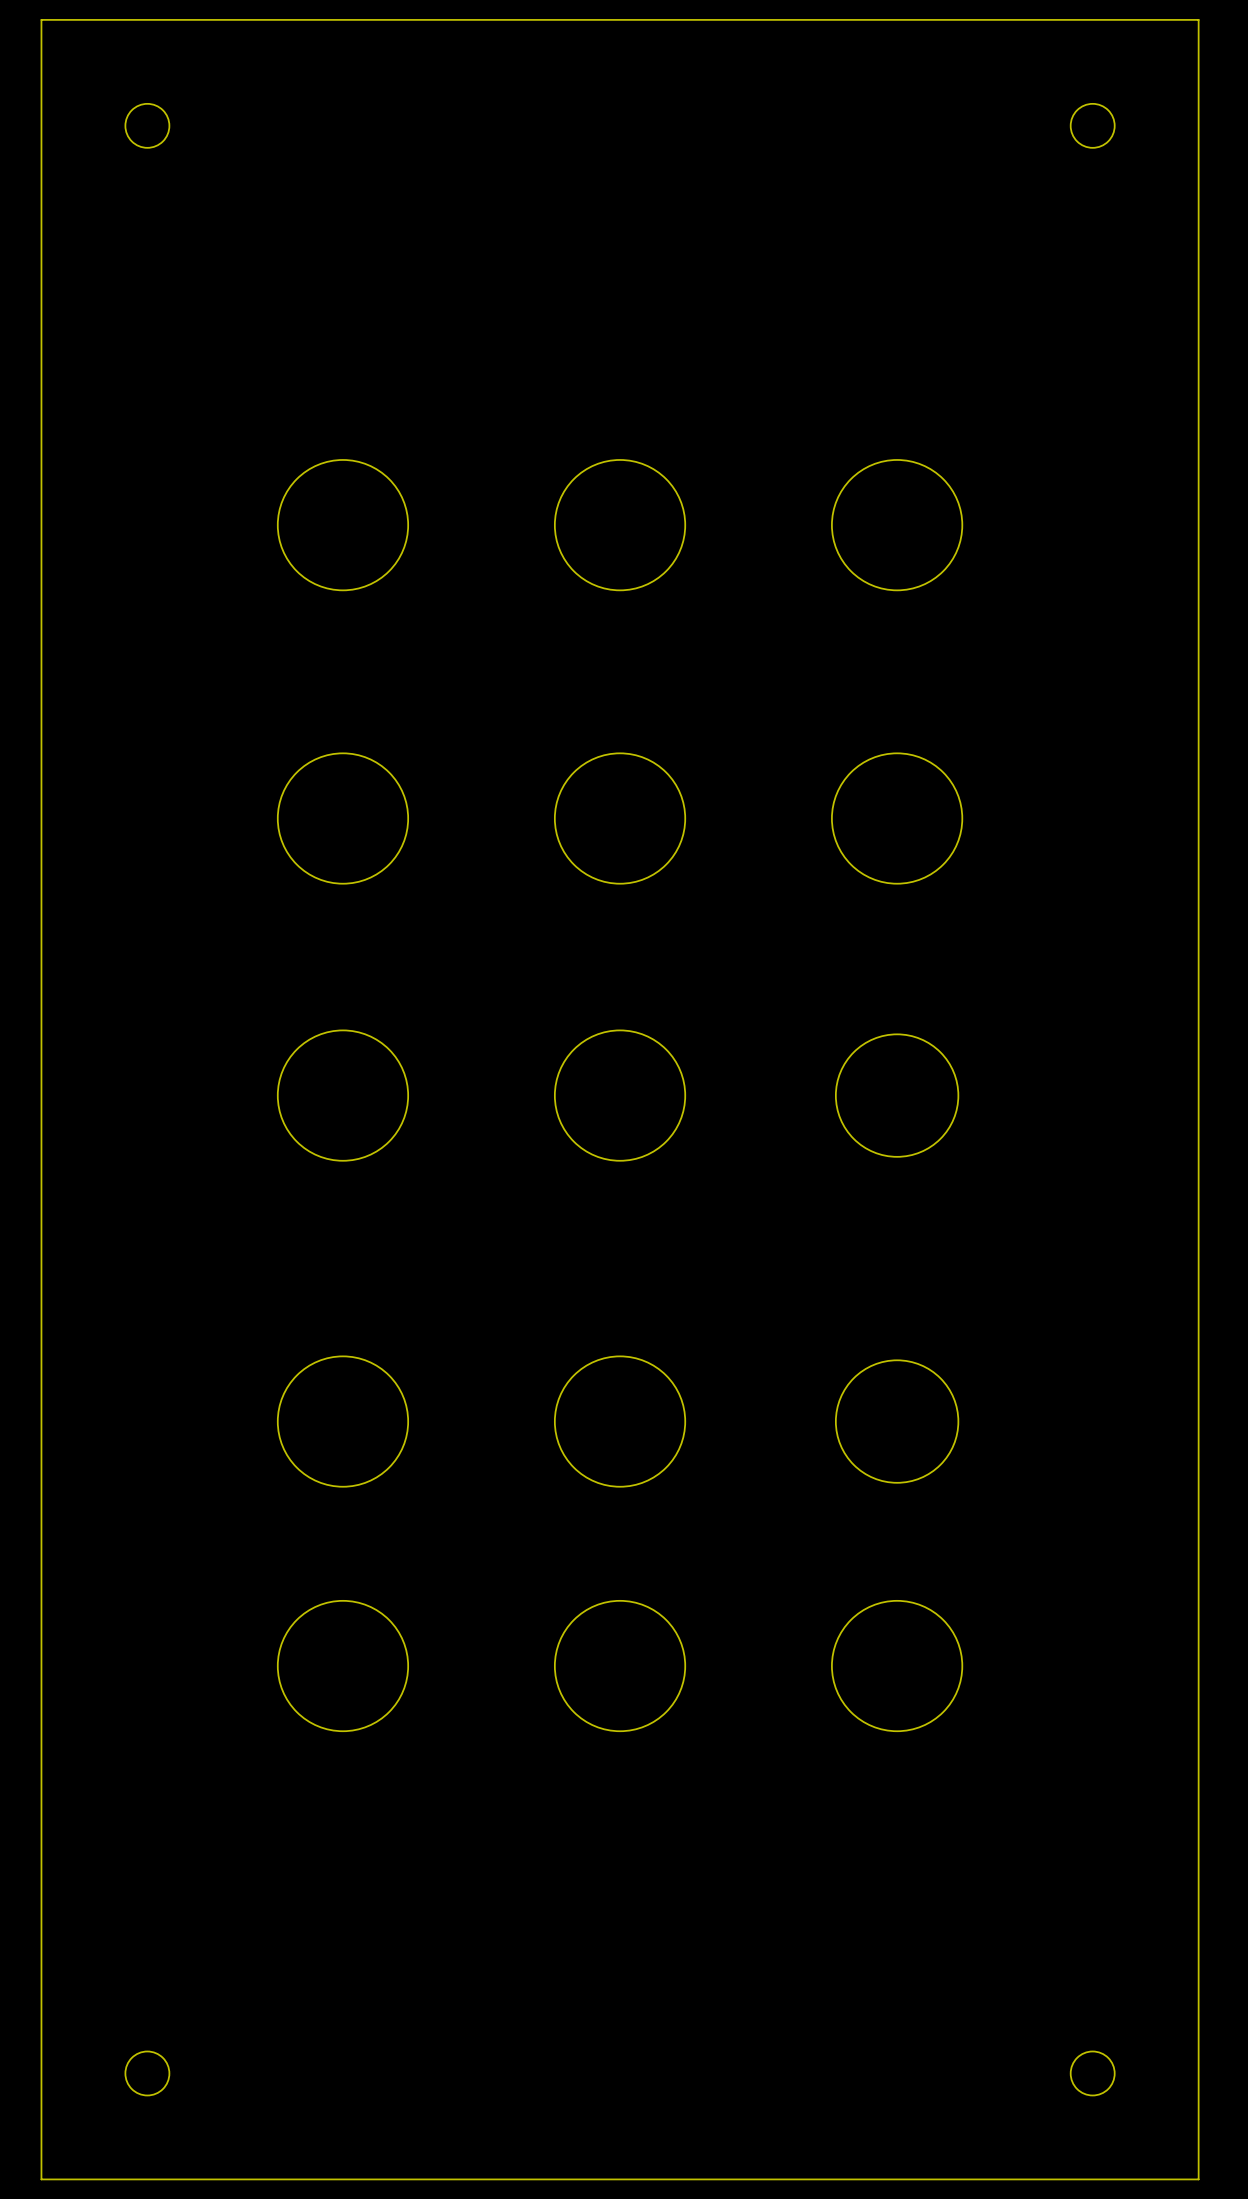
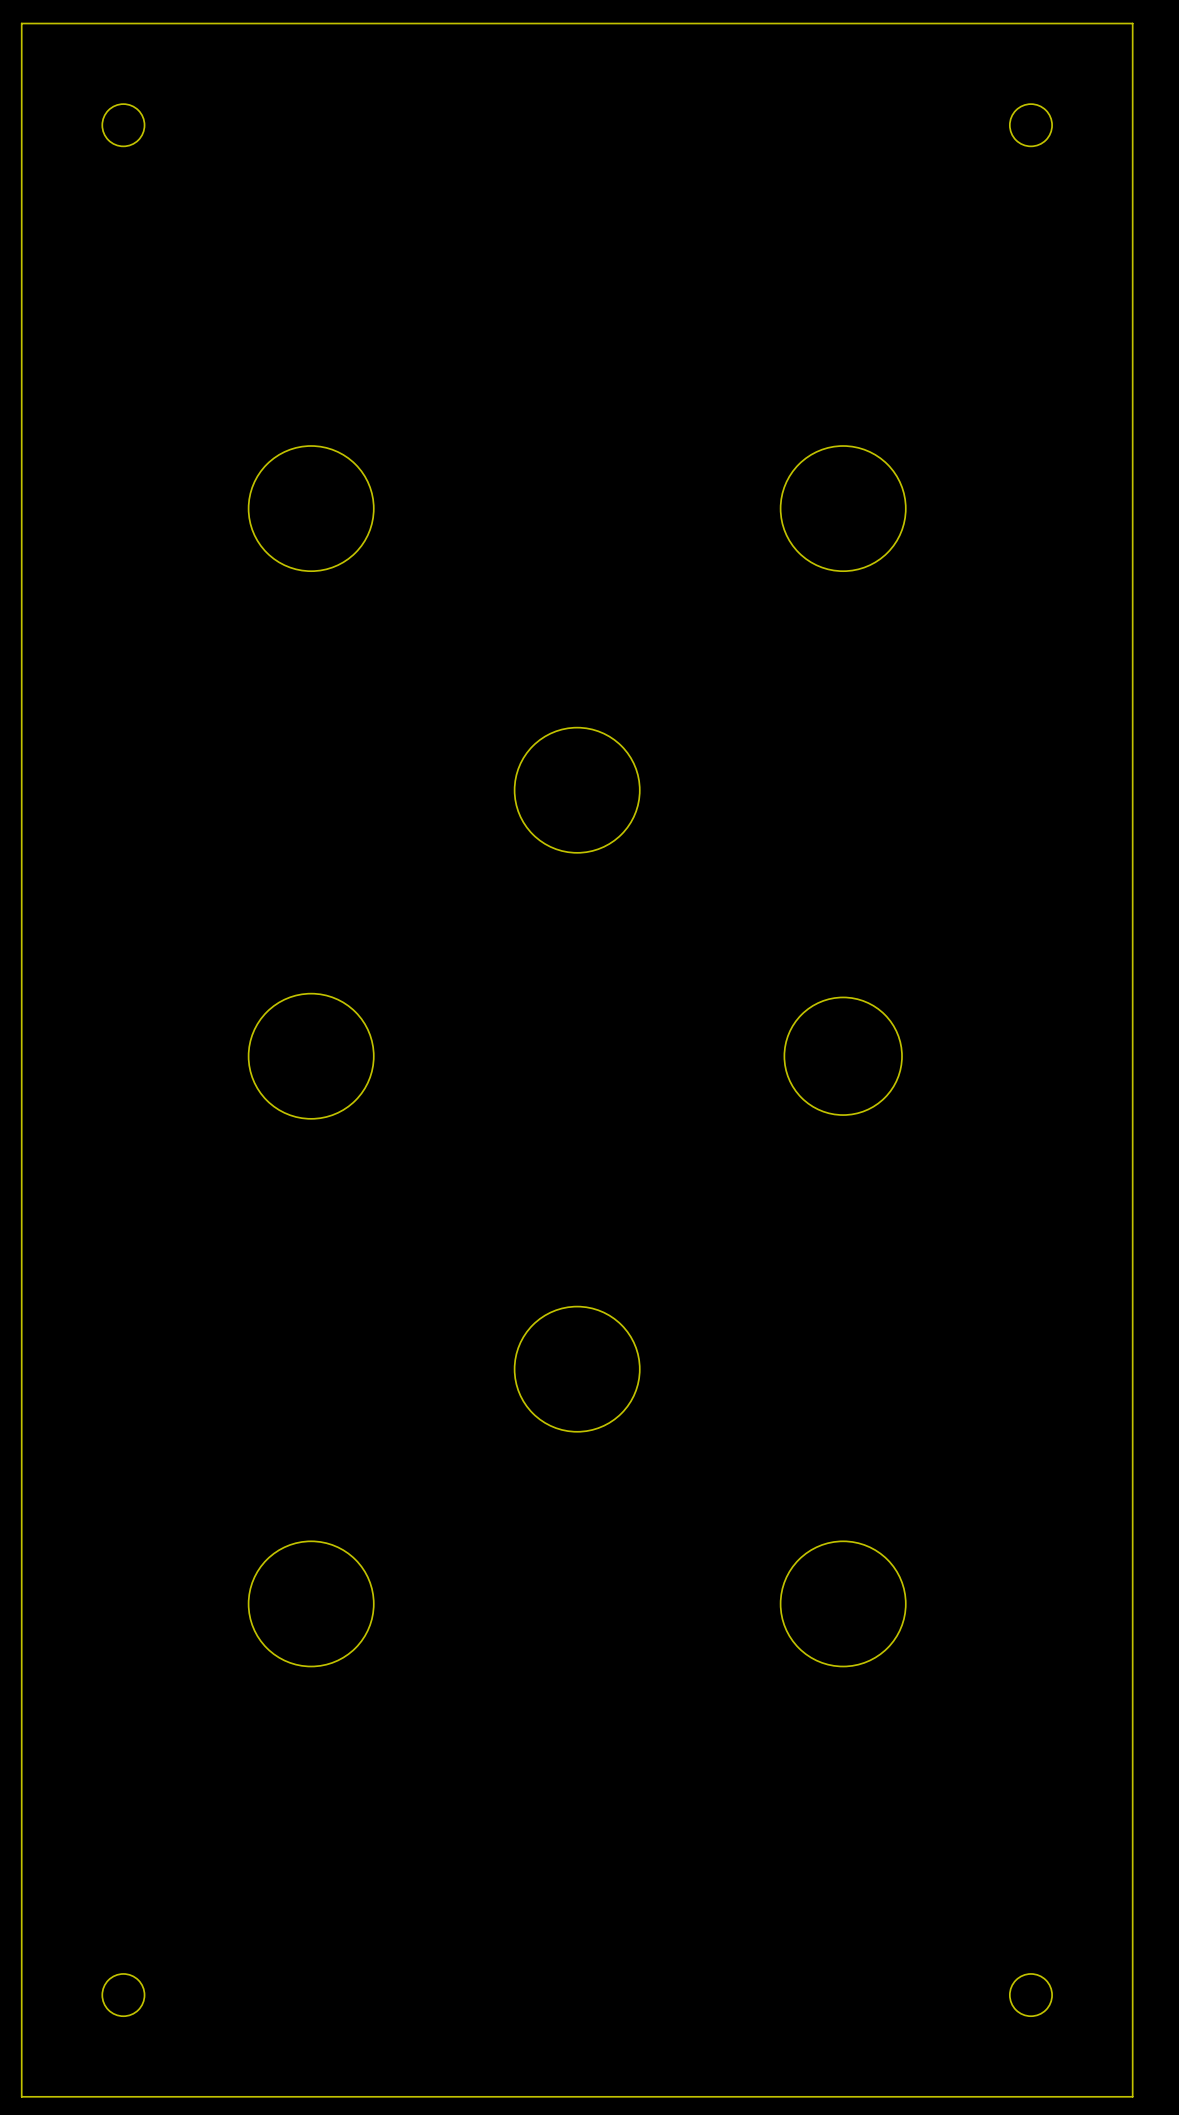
round board edge: [554, 459, 686, 591] -> none
round board edge: [277, 752, 409, 885] -> none
round board edge: [831, 752, 963, 885] -> none
round board edge: [554, 1029, 686, 1162] -> none
round board edge: [277, 1355, 409, 1488] -> none
round board edge: [835, 1359, 959, 1484] -> none
round board edge: [554, 1600, 686, 1732] -> none

